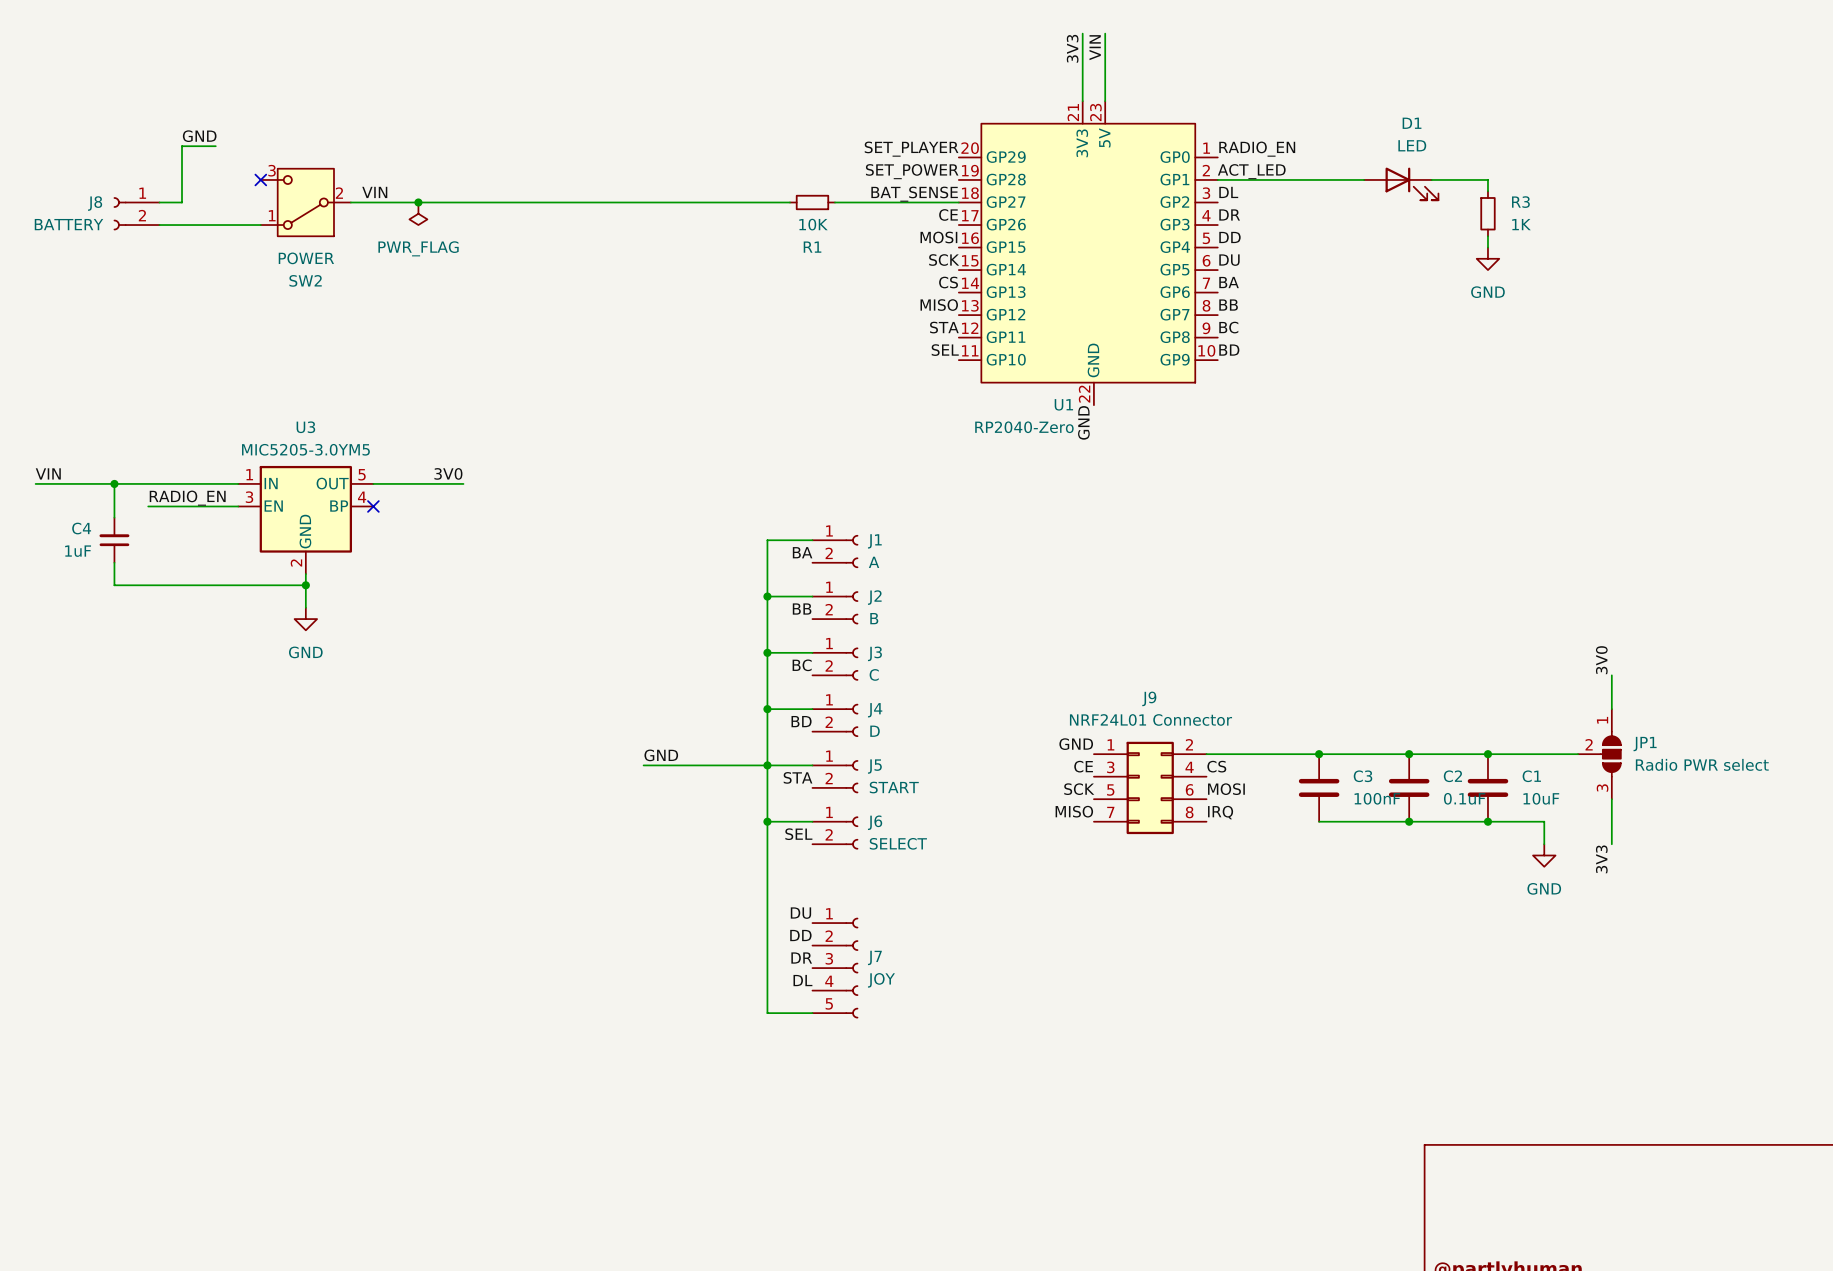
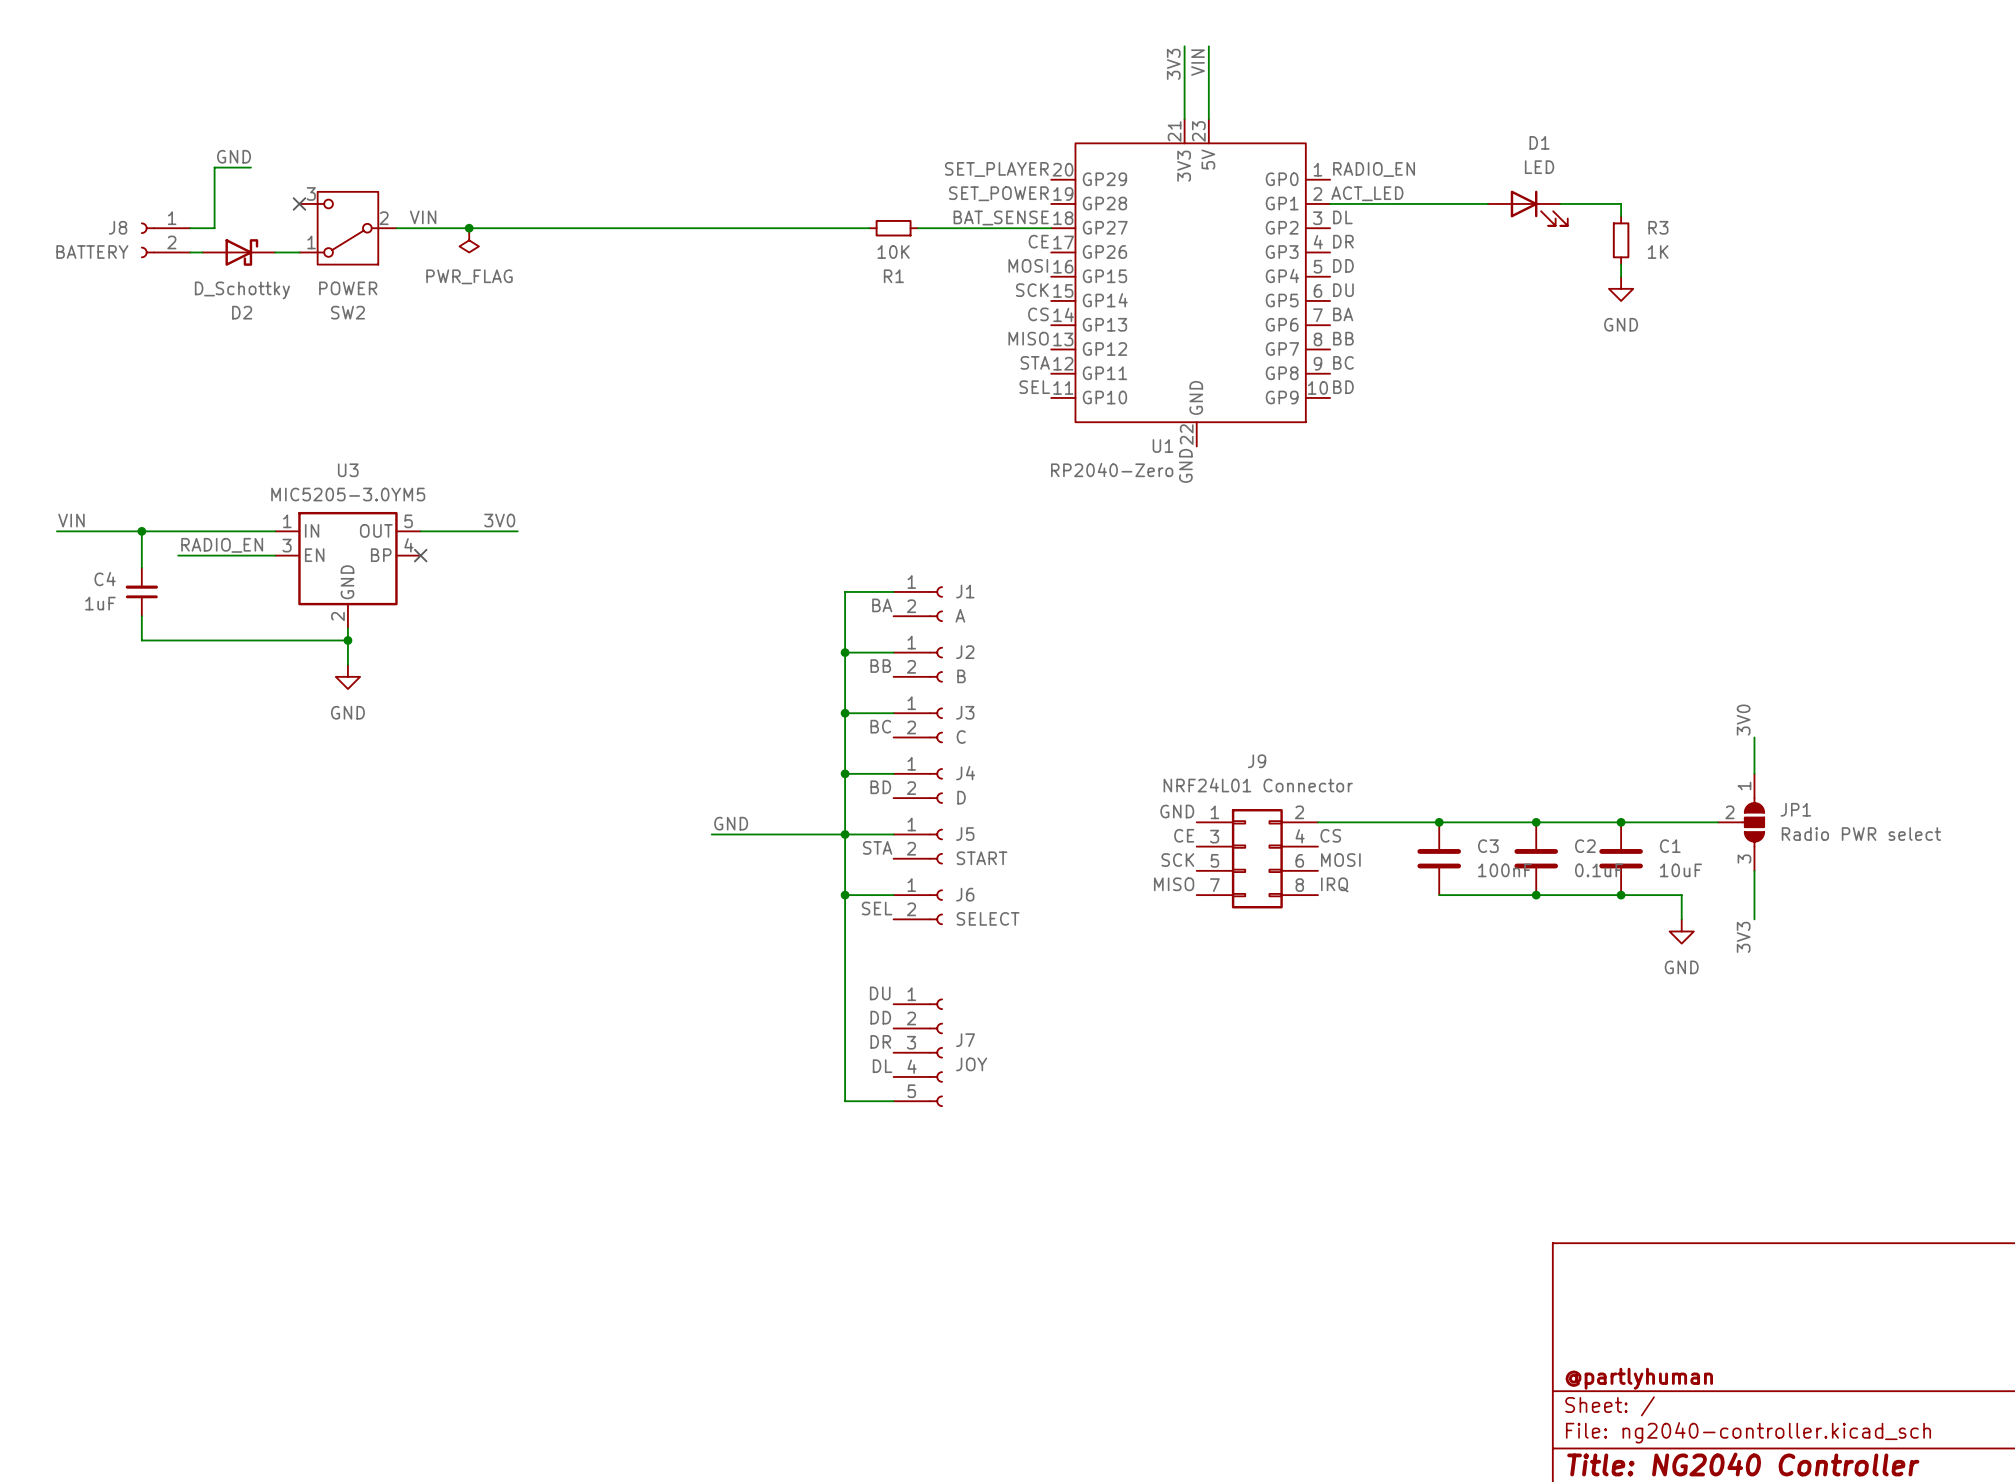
D2: none -> D_Schottky (238, 252)

